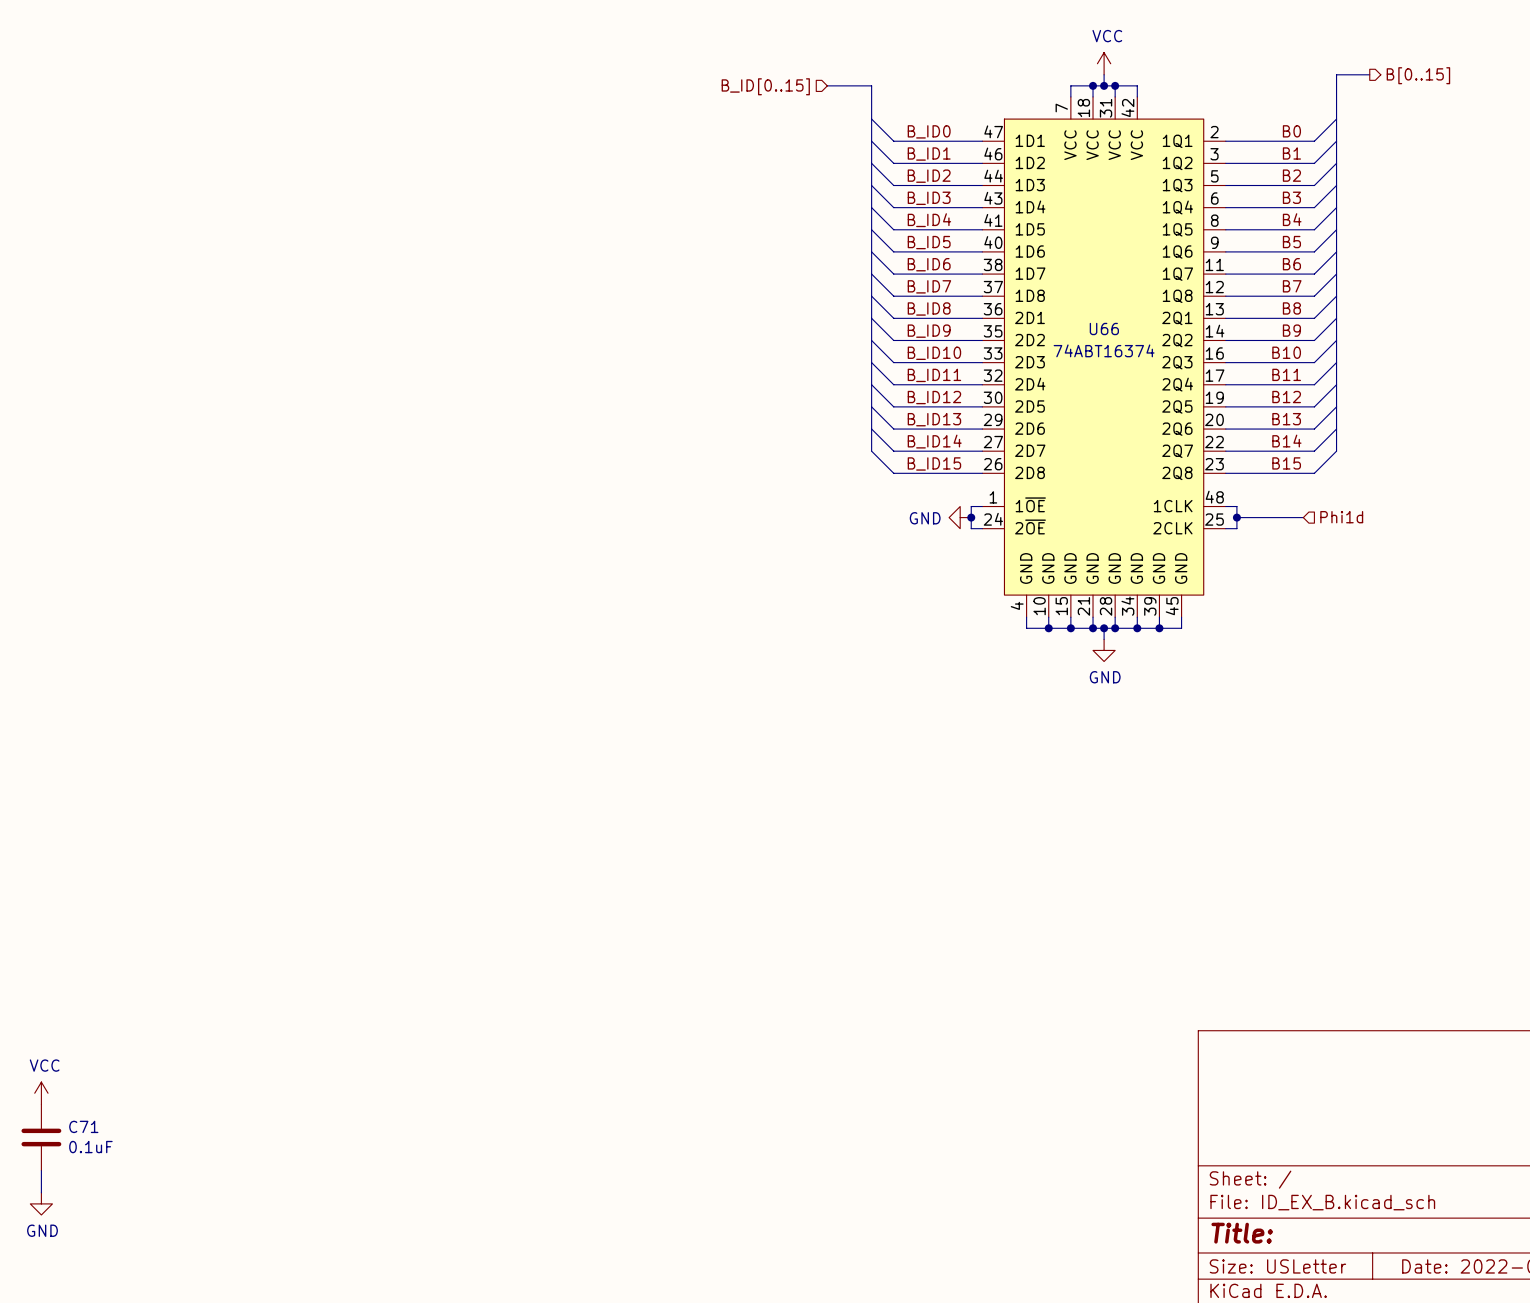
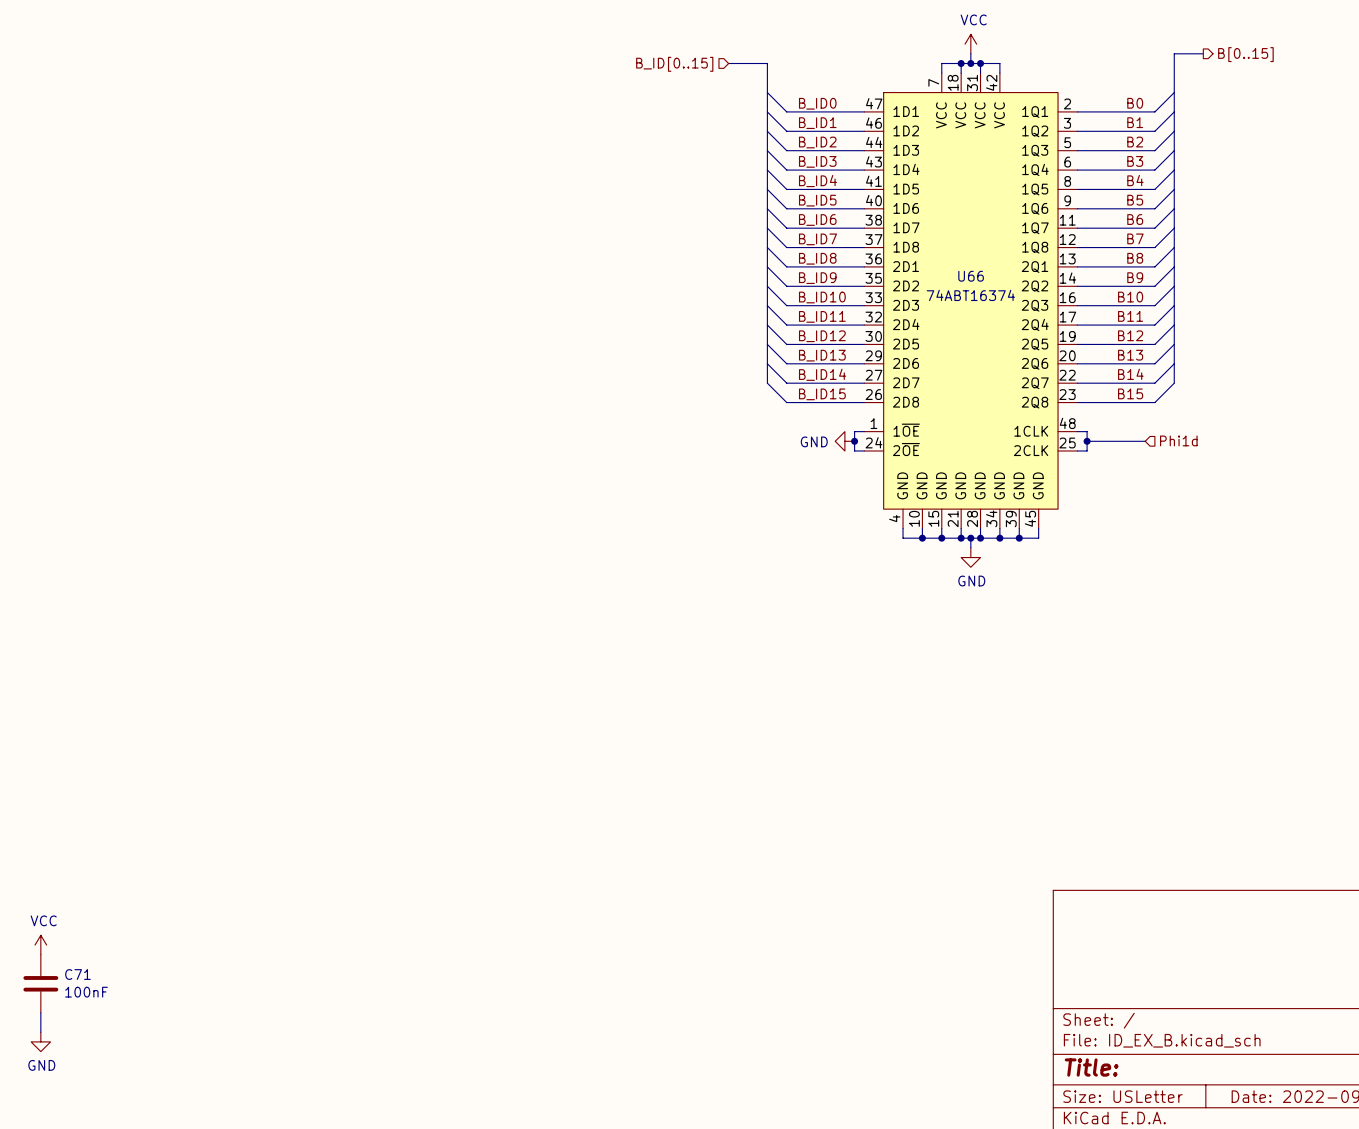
C71 value: 0.1uF (90, 1147) -> 100nF (86, 992)

